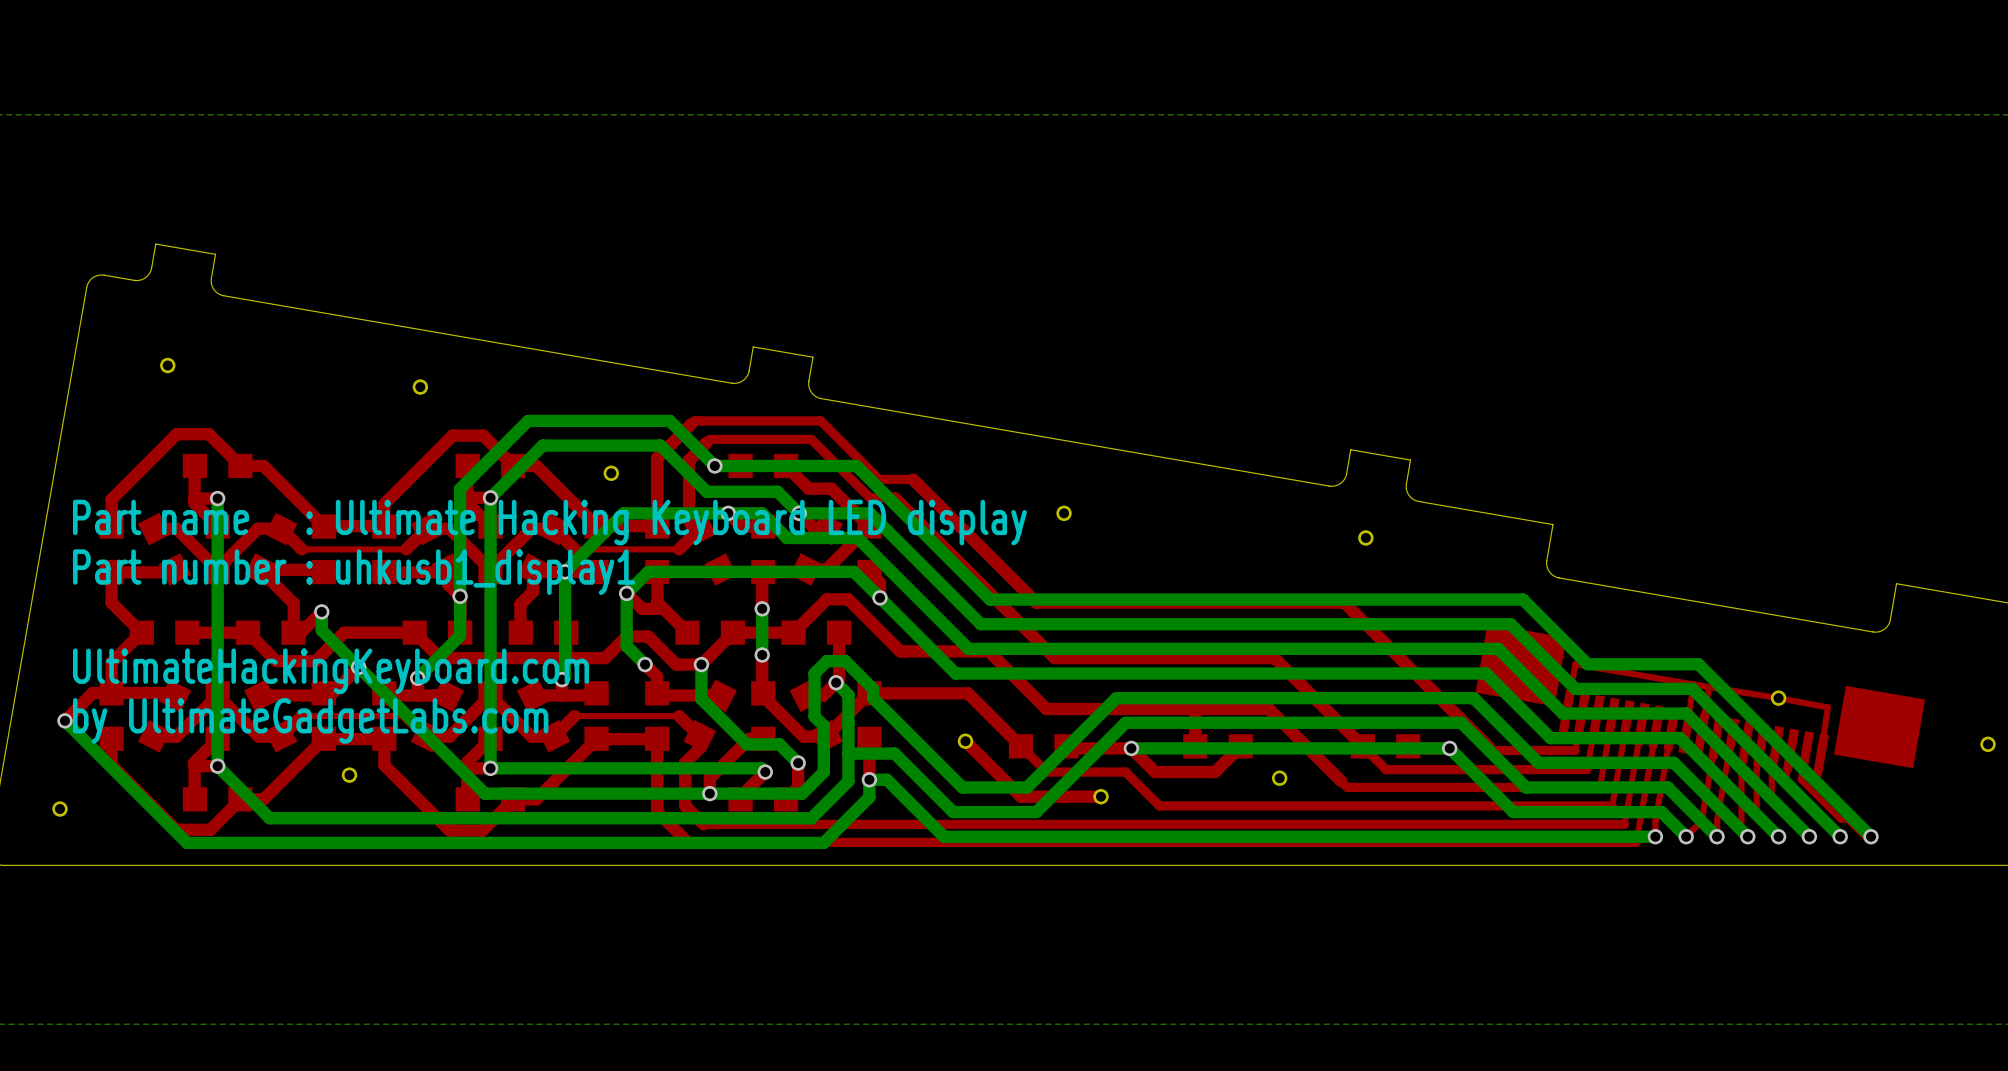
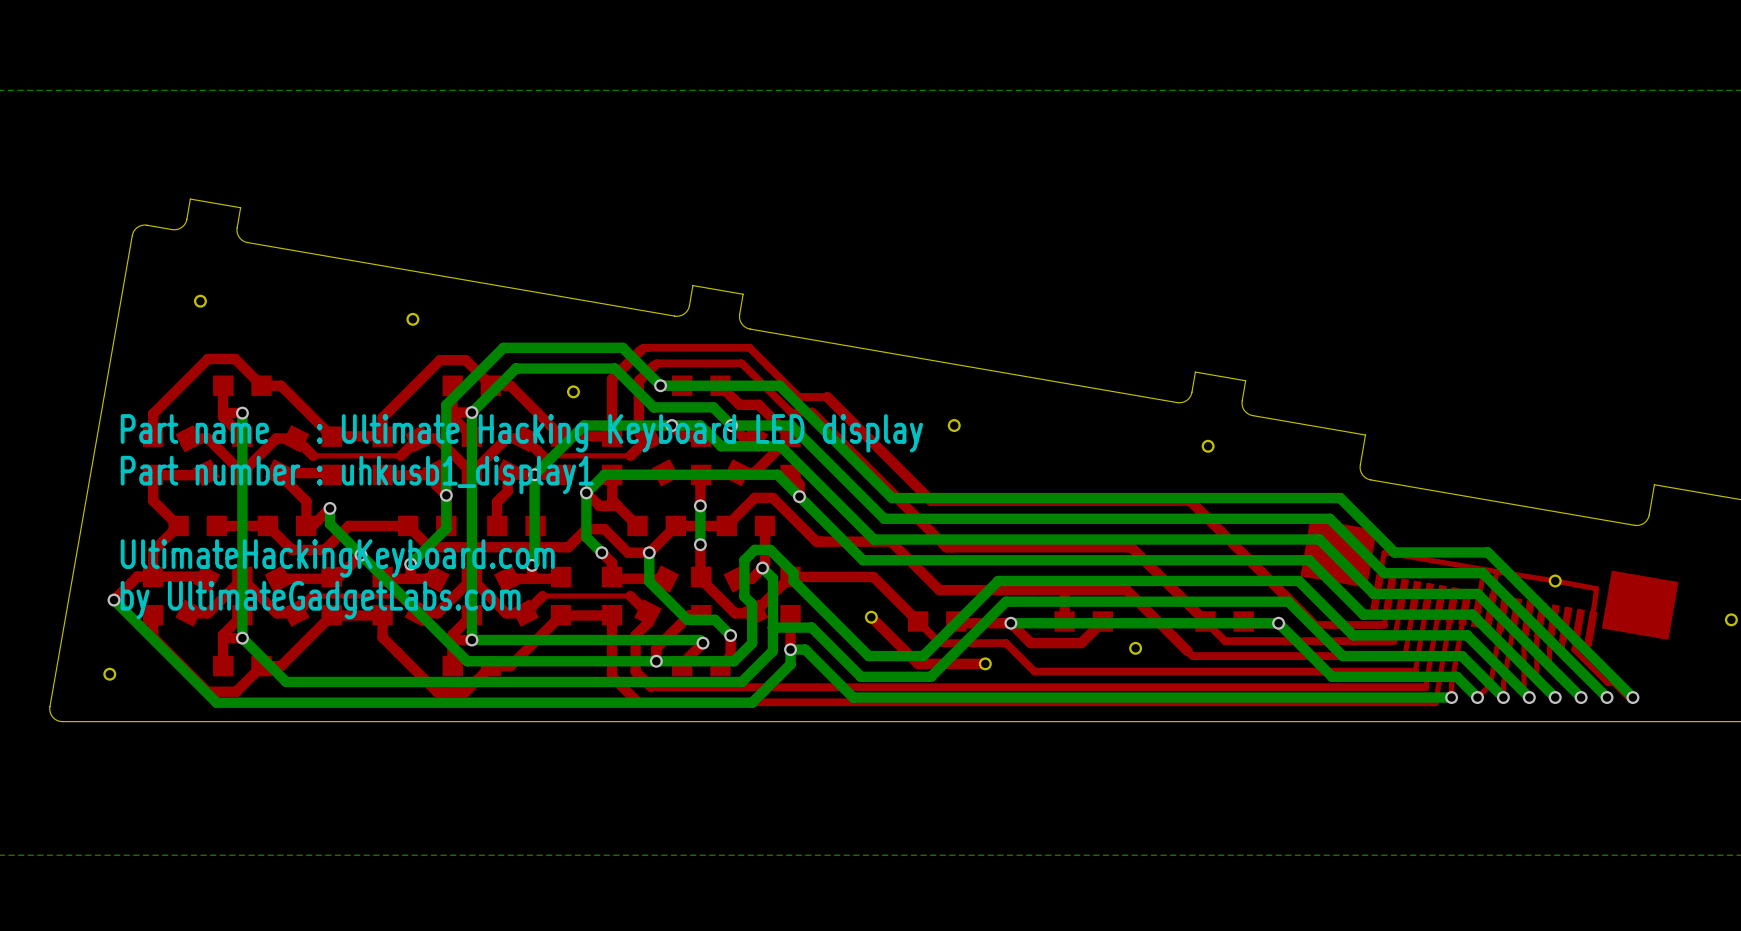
part: (349, 775) -> none

